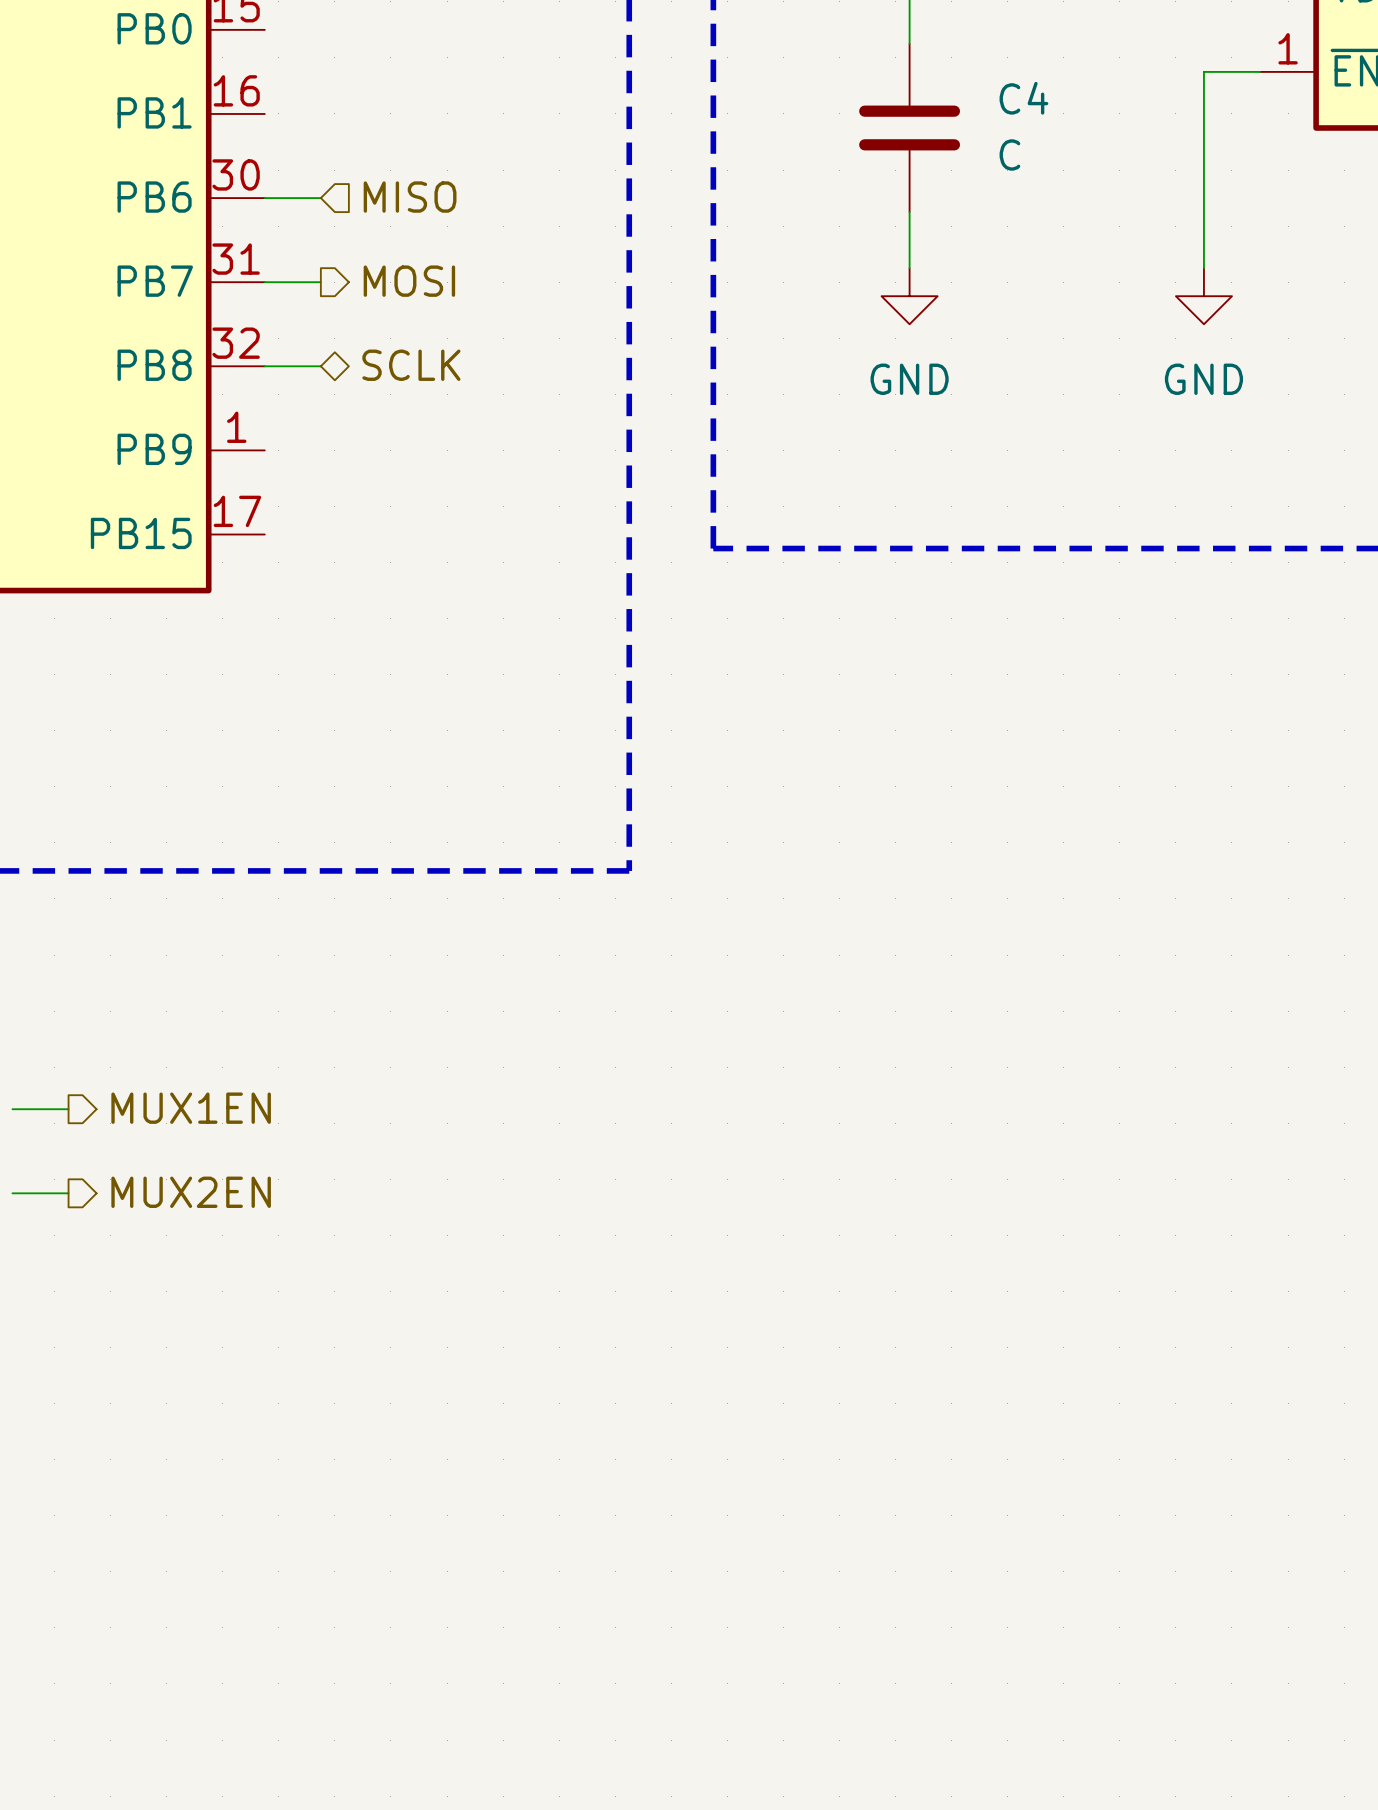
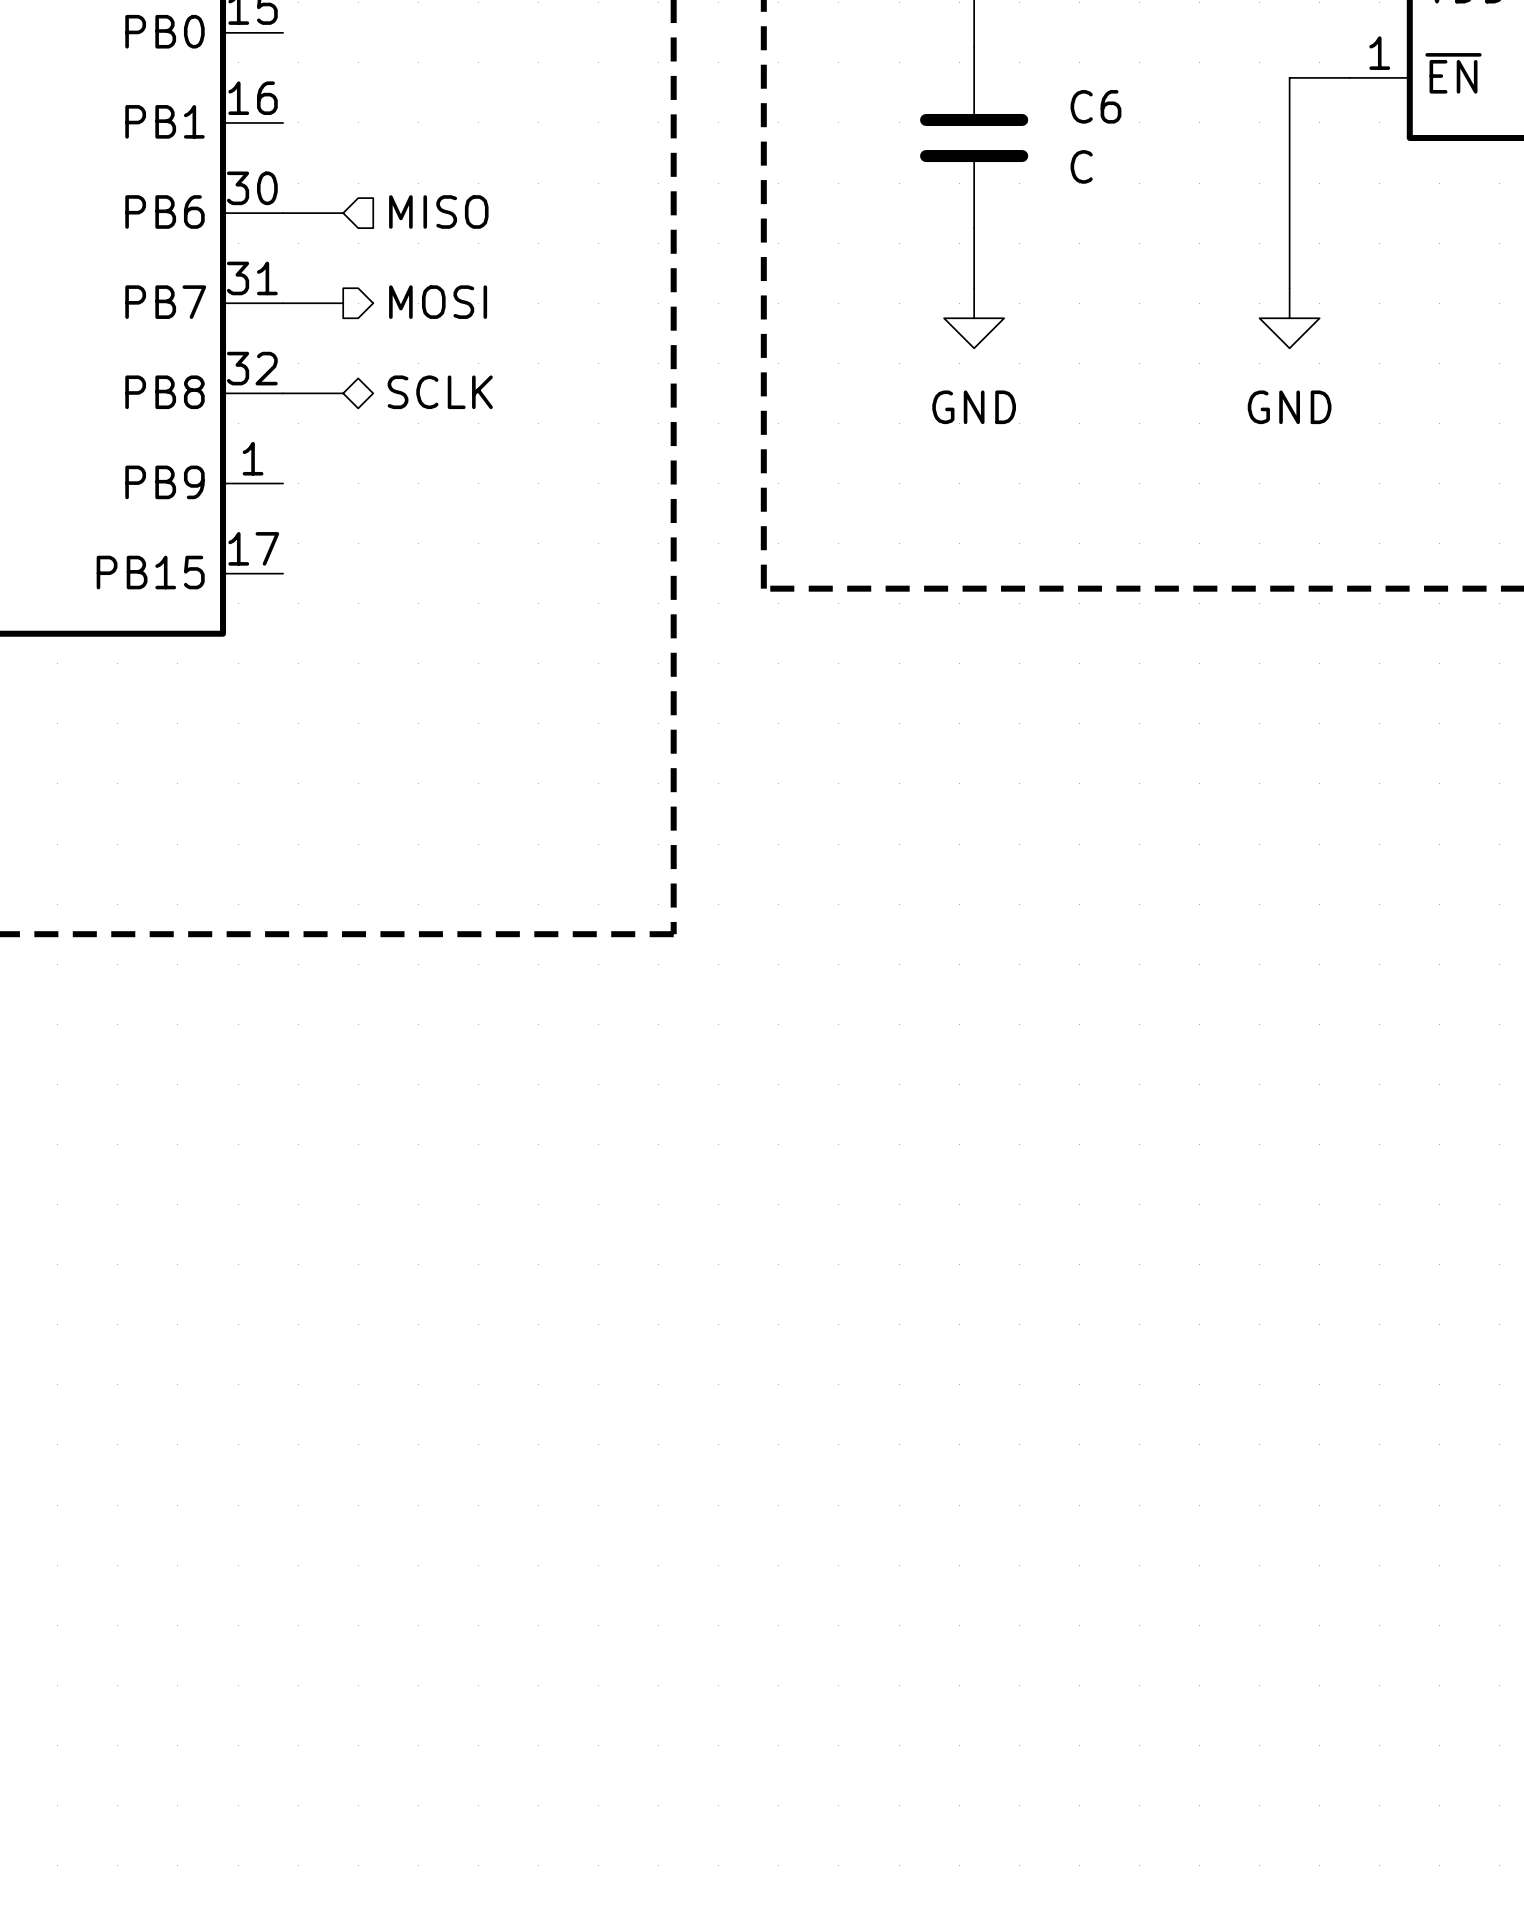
C4 name: C4 (1023, 98) -> C6 (1095, 106)
hierarchical label: MUX1EN (191, 1108) -> none
wire: (12, 1109) (68, 1109) -> none
hierarchical label: MUX2EN (191, 1192) -> none
wire: (12, 1193) (68, 1193) -> none

